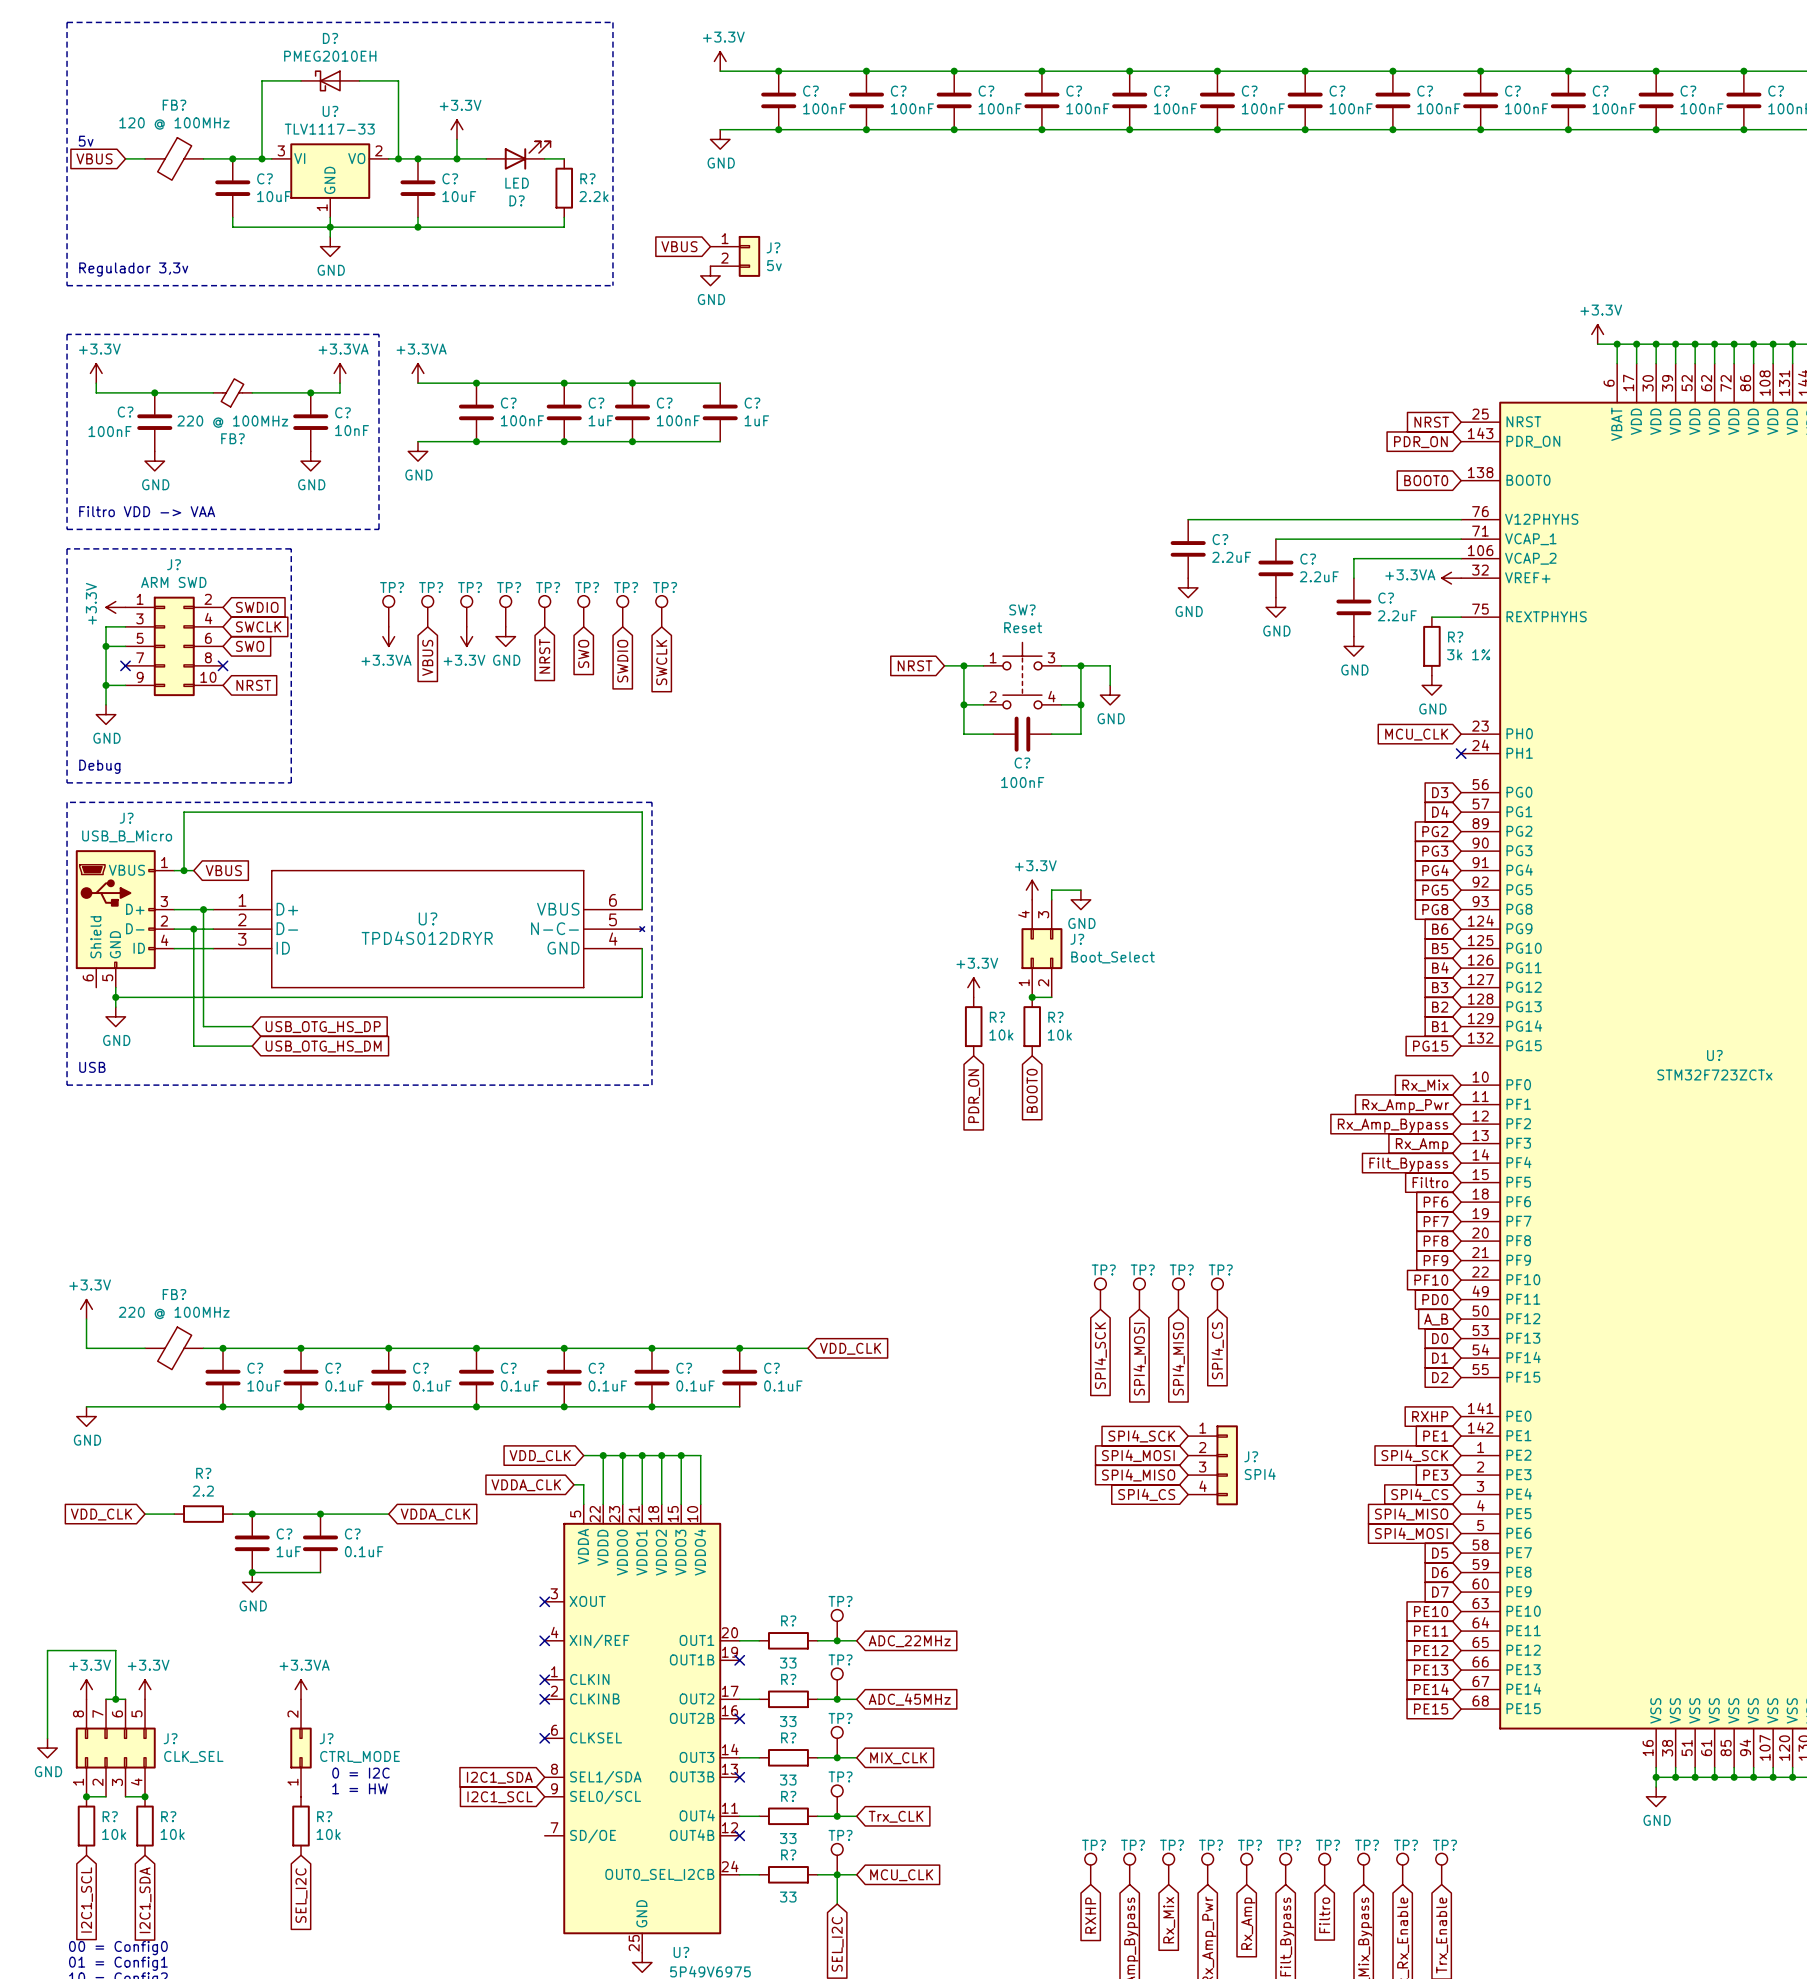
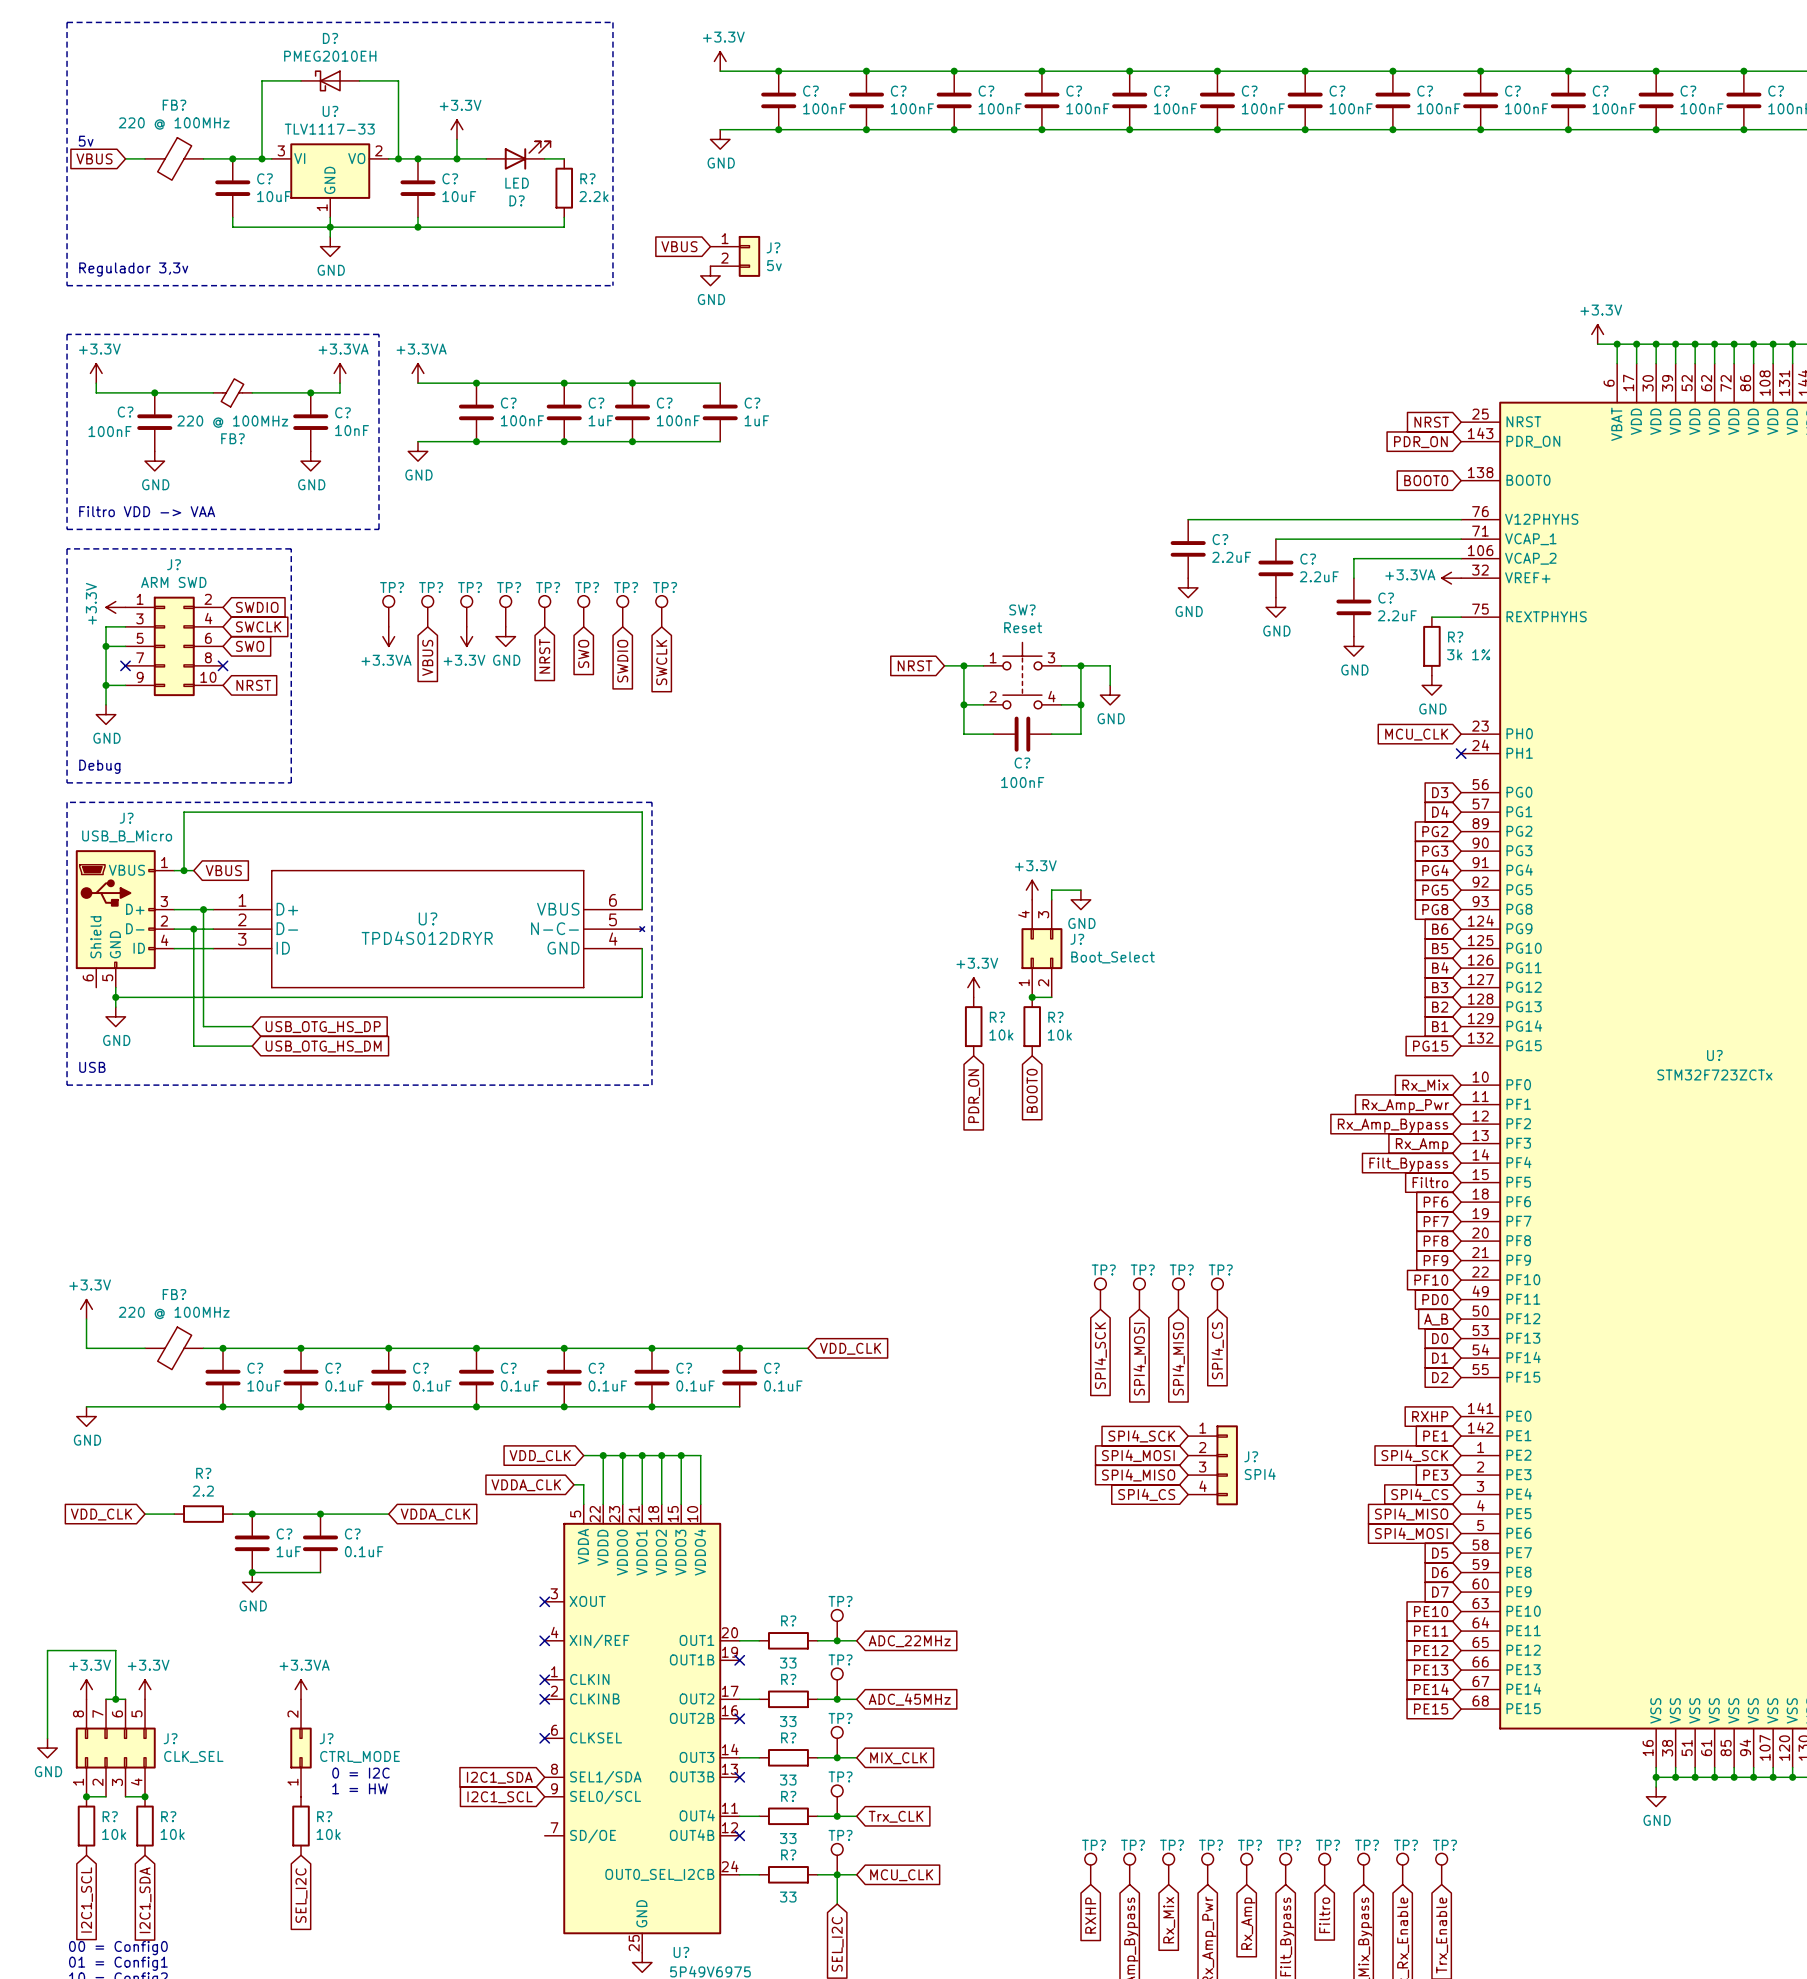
FB? value: 120 @ 100MHz (174, 123) -> 220 @ 100MHz (174, 123)

